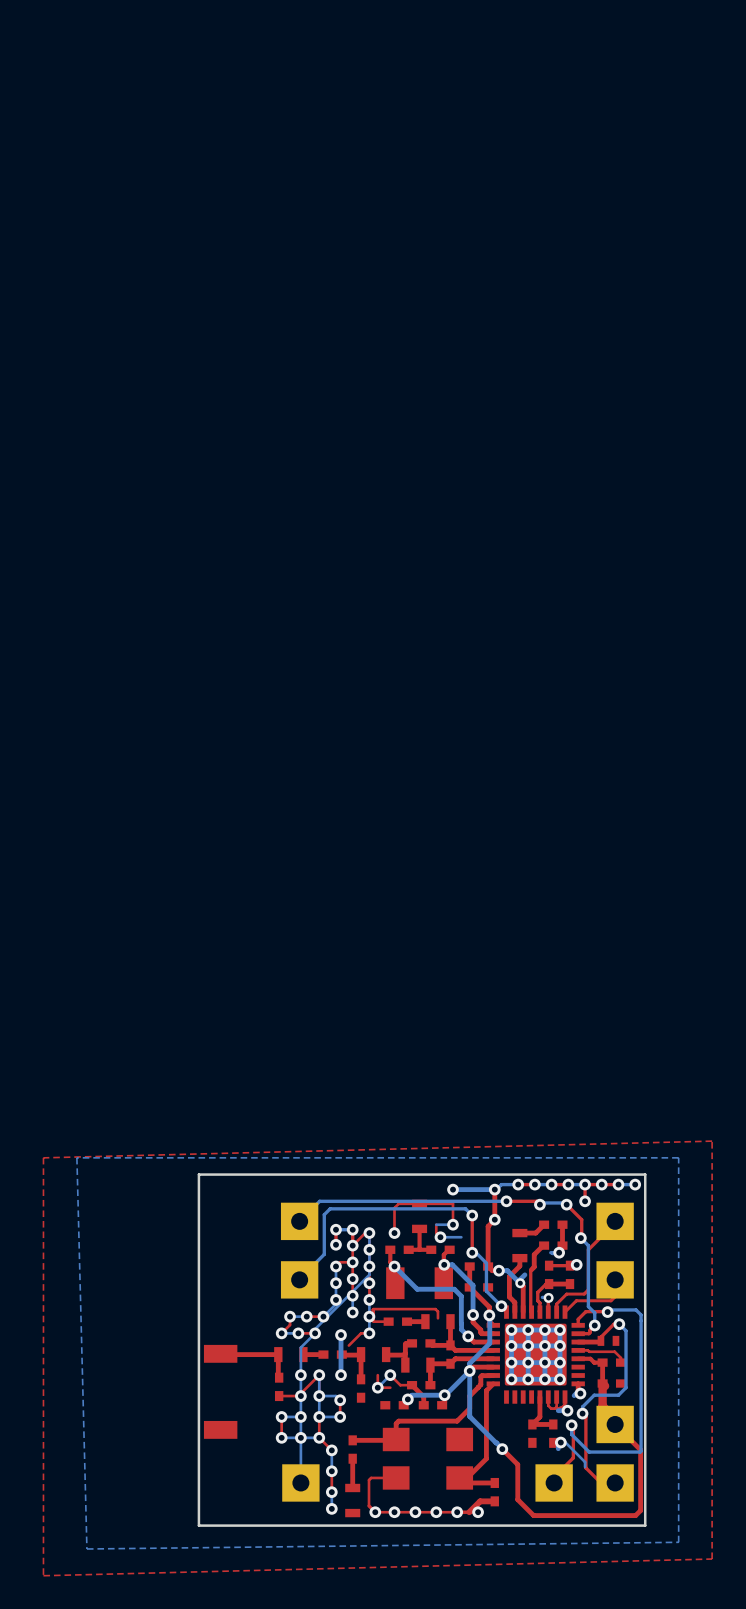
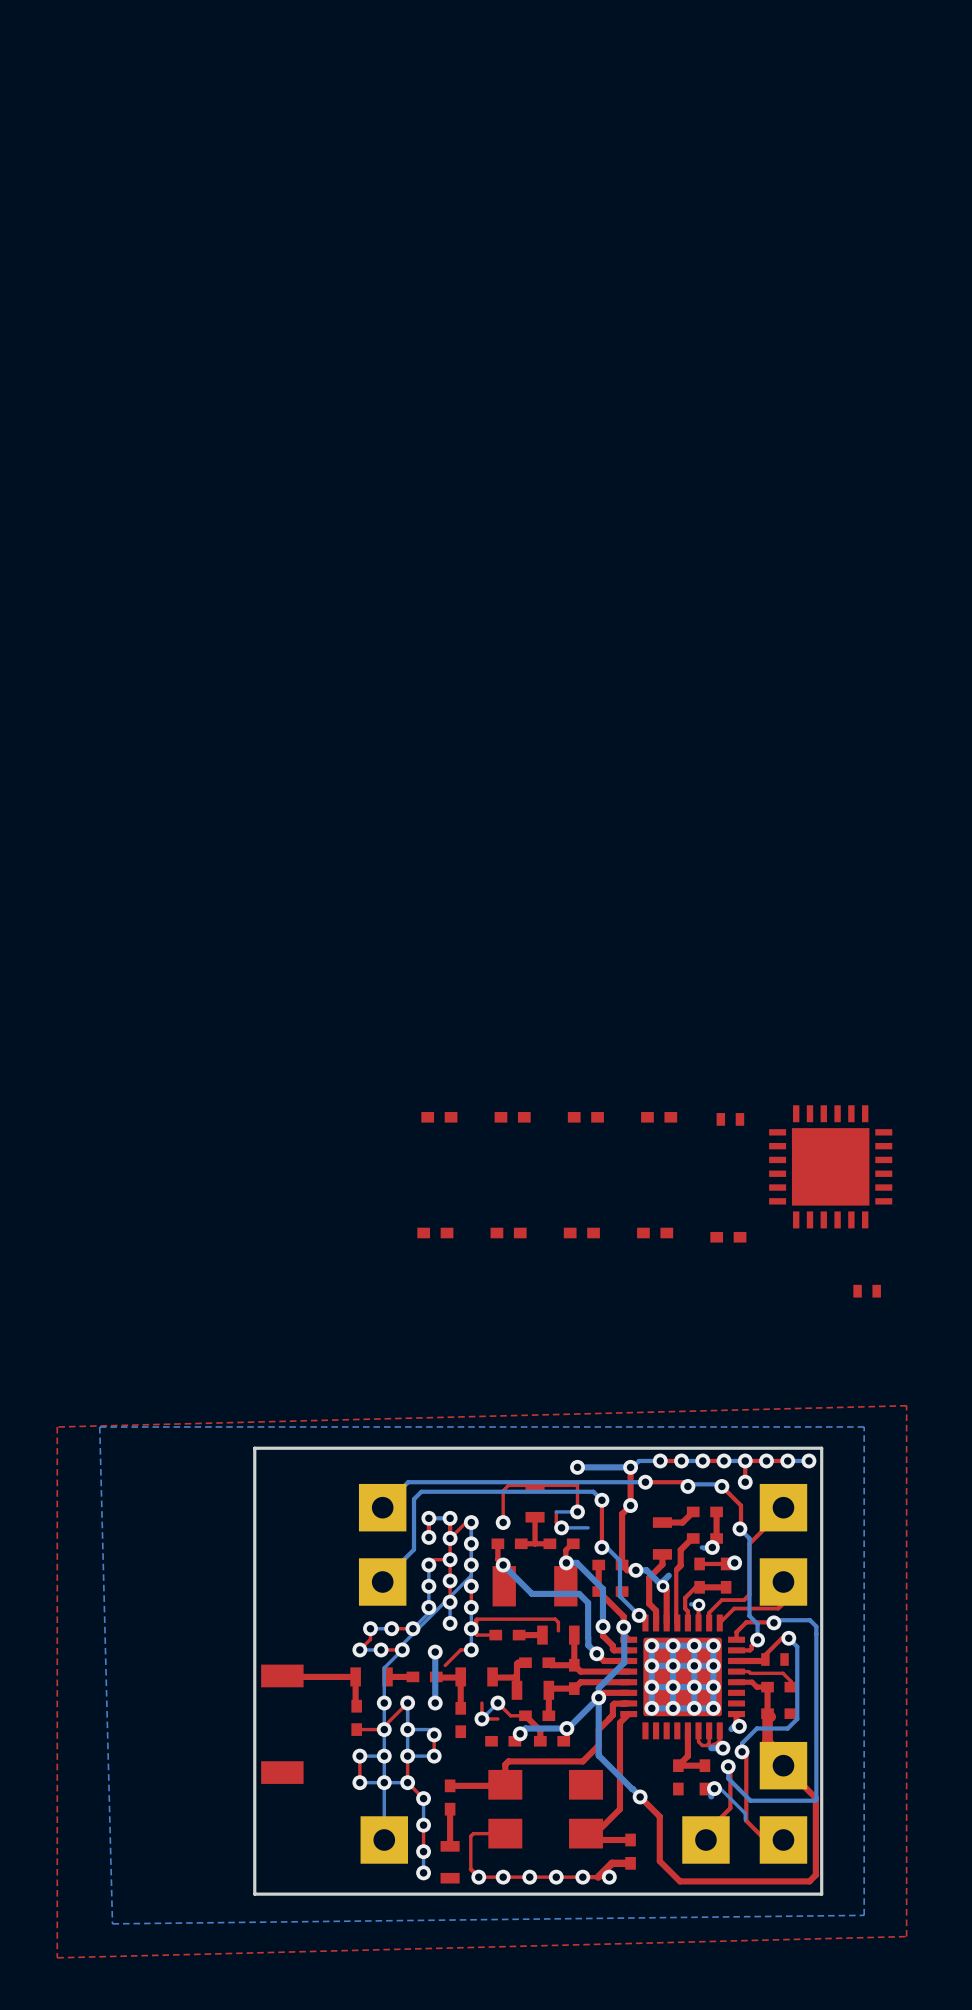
part: none -> (439, 1117)
part: none -> (512, 1117)
part: none -> (585, 1117)
part: none -> (659, 1117)
part: none -> (730, 1119)
part: none -> (830, 1166)
part: none -> (435, 1233)
part: none -> (508, 1233)
part: none -> (581, 1233)
part: none -> (655, 1233)
part: none -> (728, 1237)
part: none -> (867, 1291)

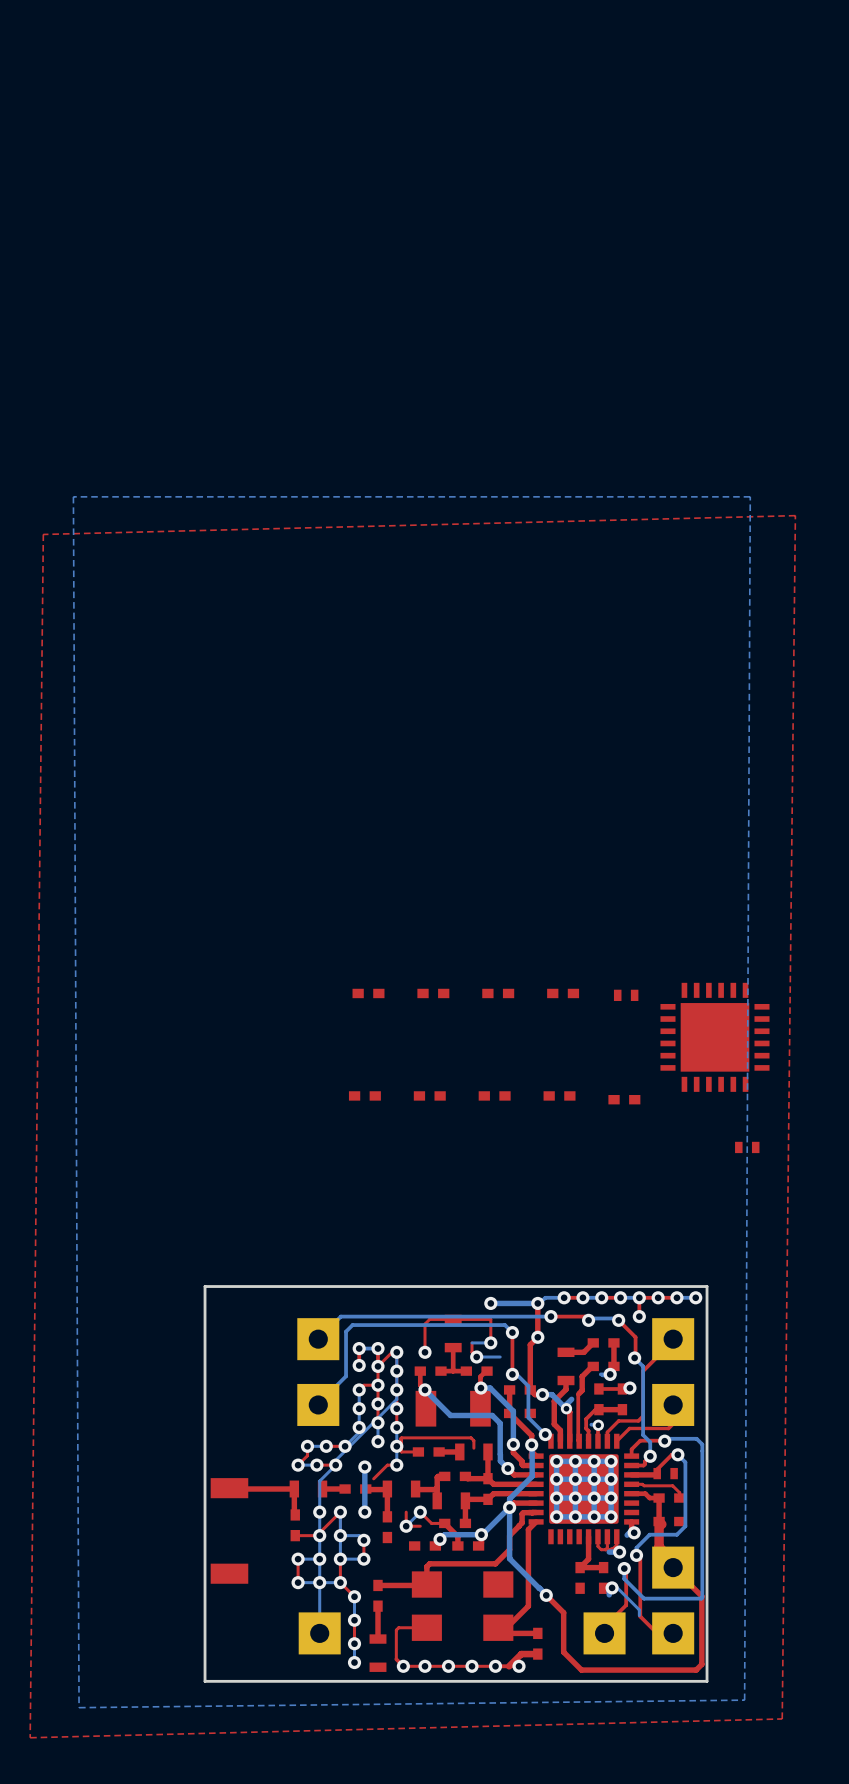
bottom zone outline: (864, 1915) (864, 1427) (99, 1427) (112, 1923) -> (744, 1700) (750, 496) (73, 496) (79, 1707)
top zone outline: (906, 1936) (906, 1405) (57, 1427) (57, 1957) -> (782, 1718) (795, 515) (43, 534) (30, 1737)

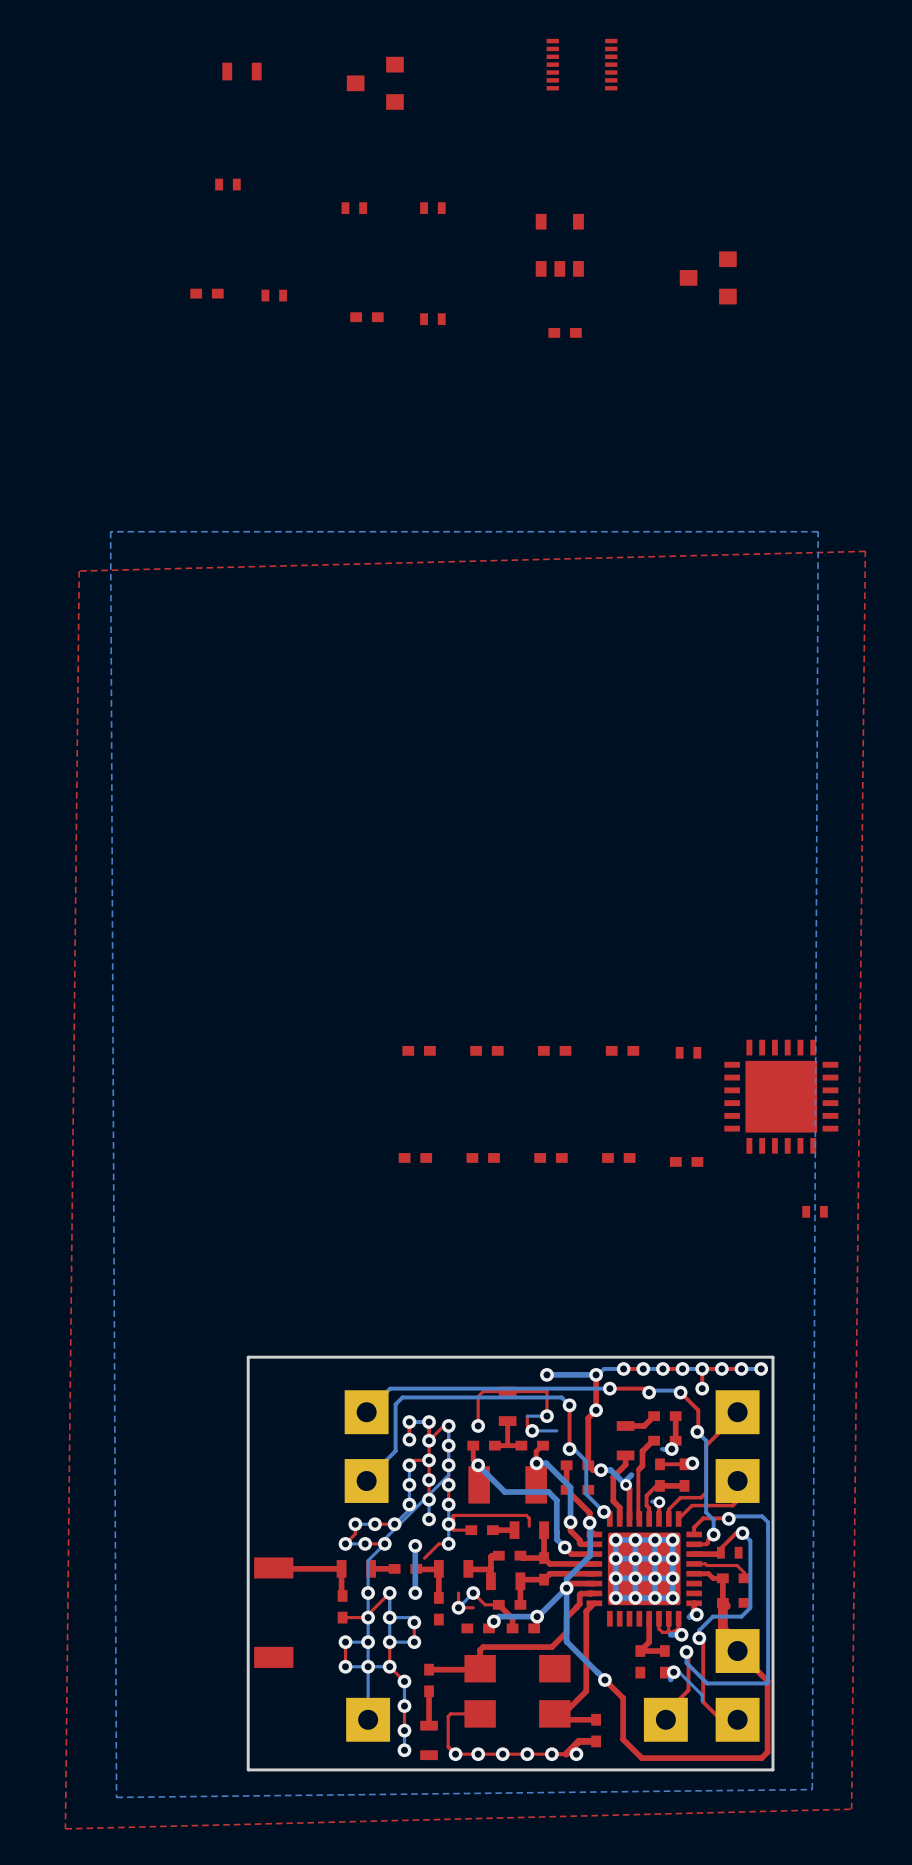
part: none -> (581, 64)
part: none -> (241, 71)
part: none -> (375, 83)
part: none -> (227, 184)
part: none -> (354, 208)
part: none -> (432, 208)
part: none -> (559, 245)
part: none -> (708, 277)
part: none -> (206, 293)
part: none -> (274, 295)
part: none -> (366, 317)
part: none -> (432, 319)
part: none -> (565, 332)

